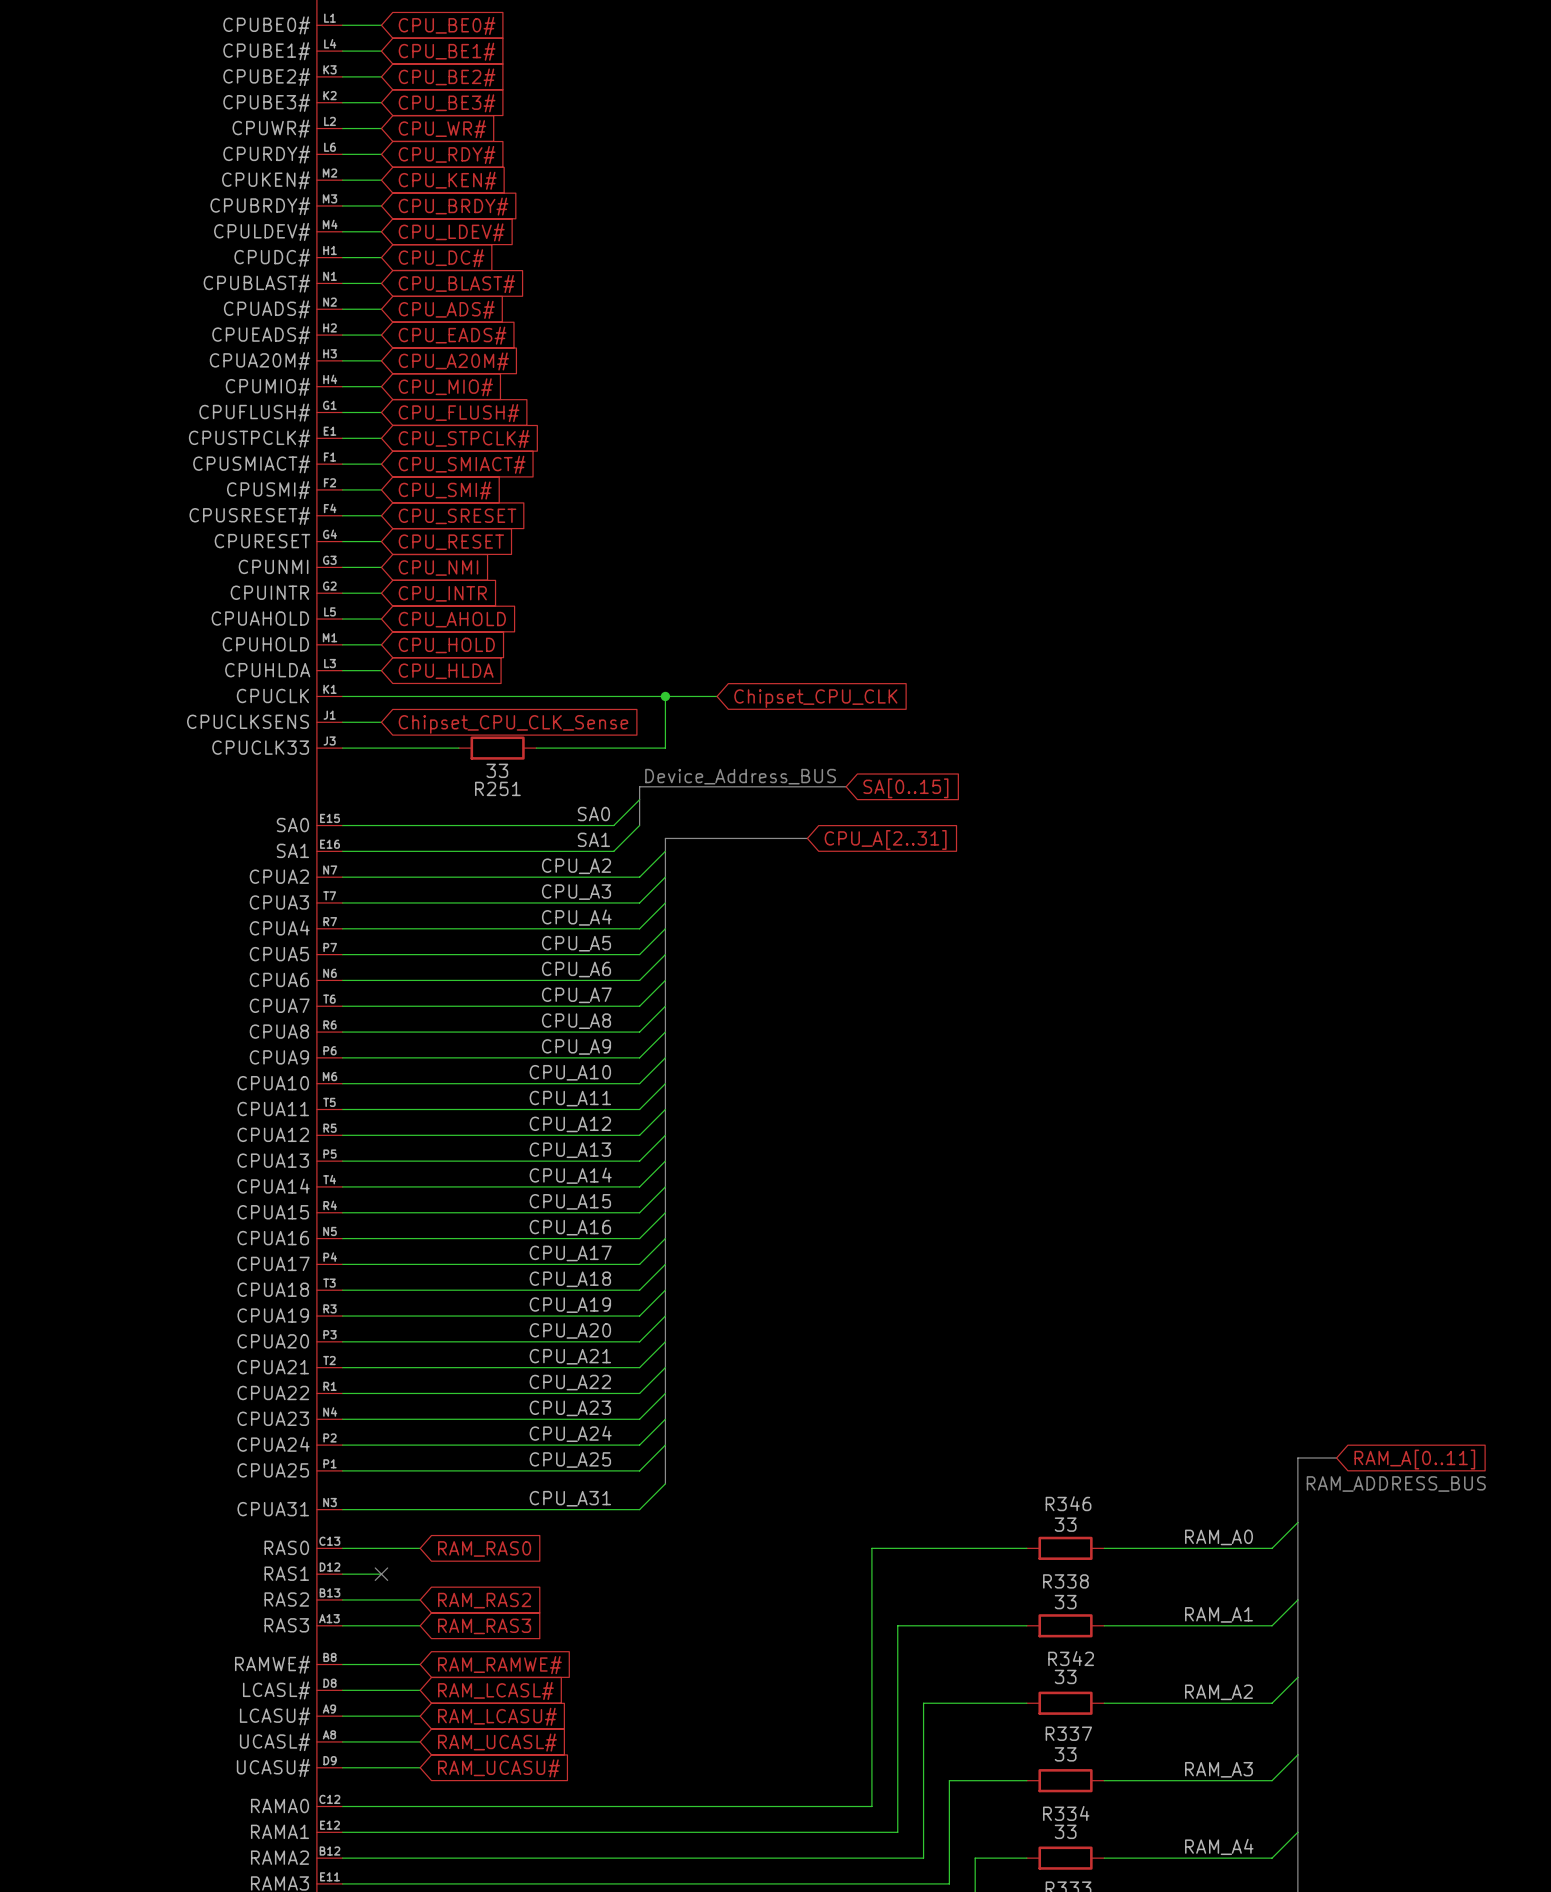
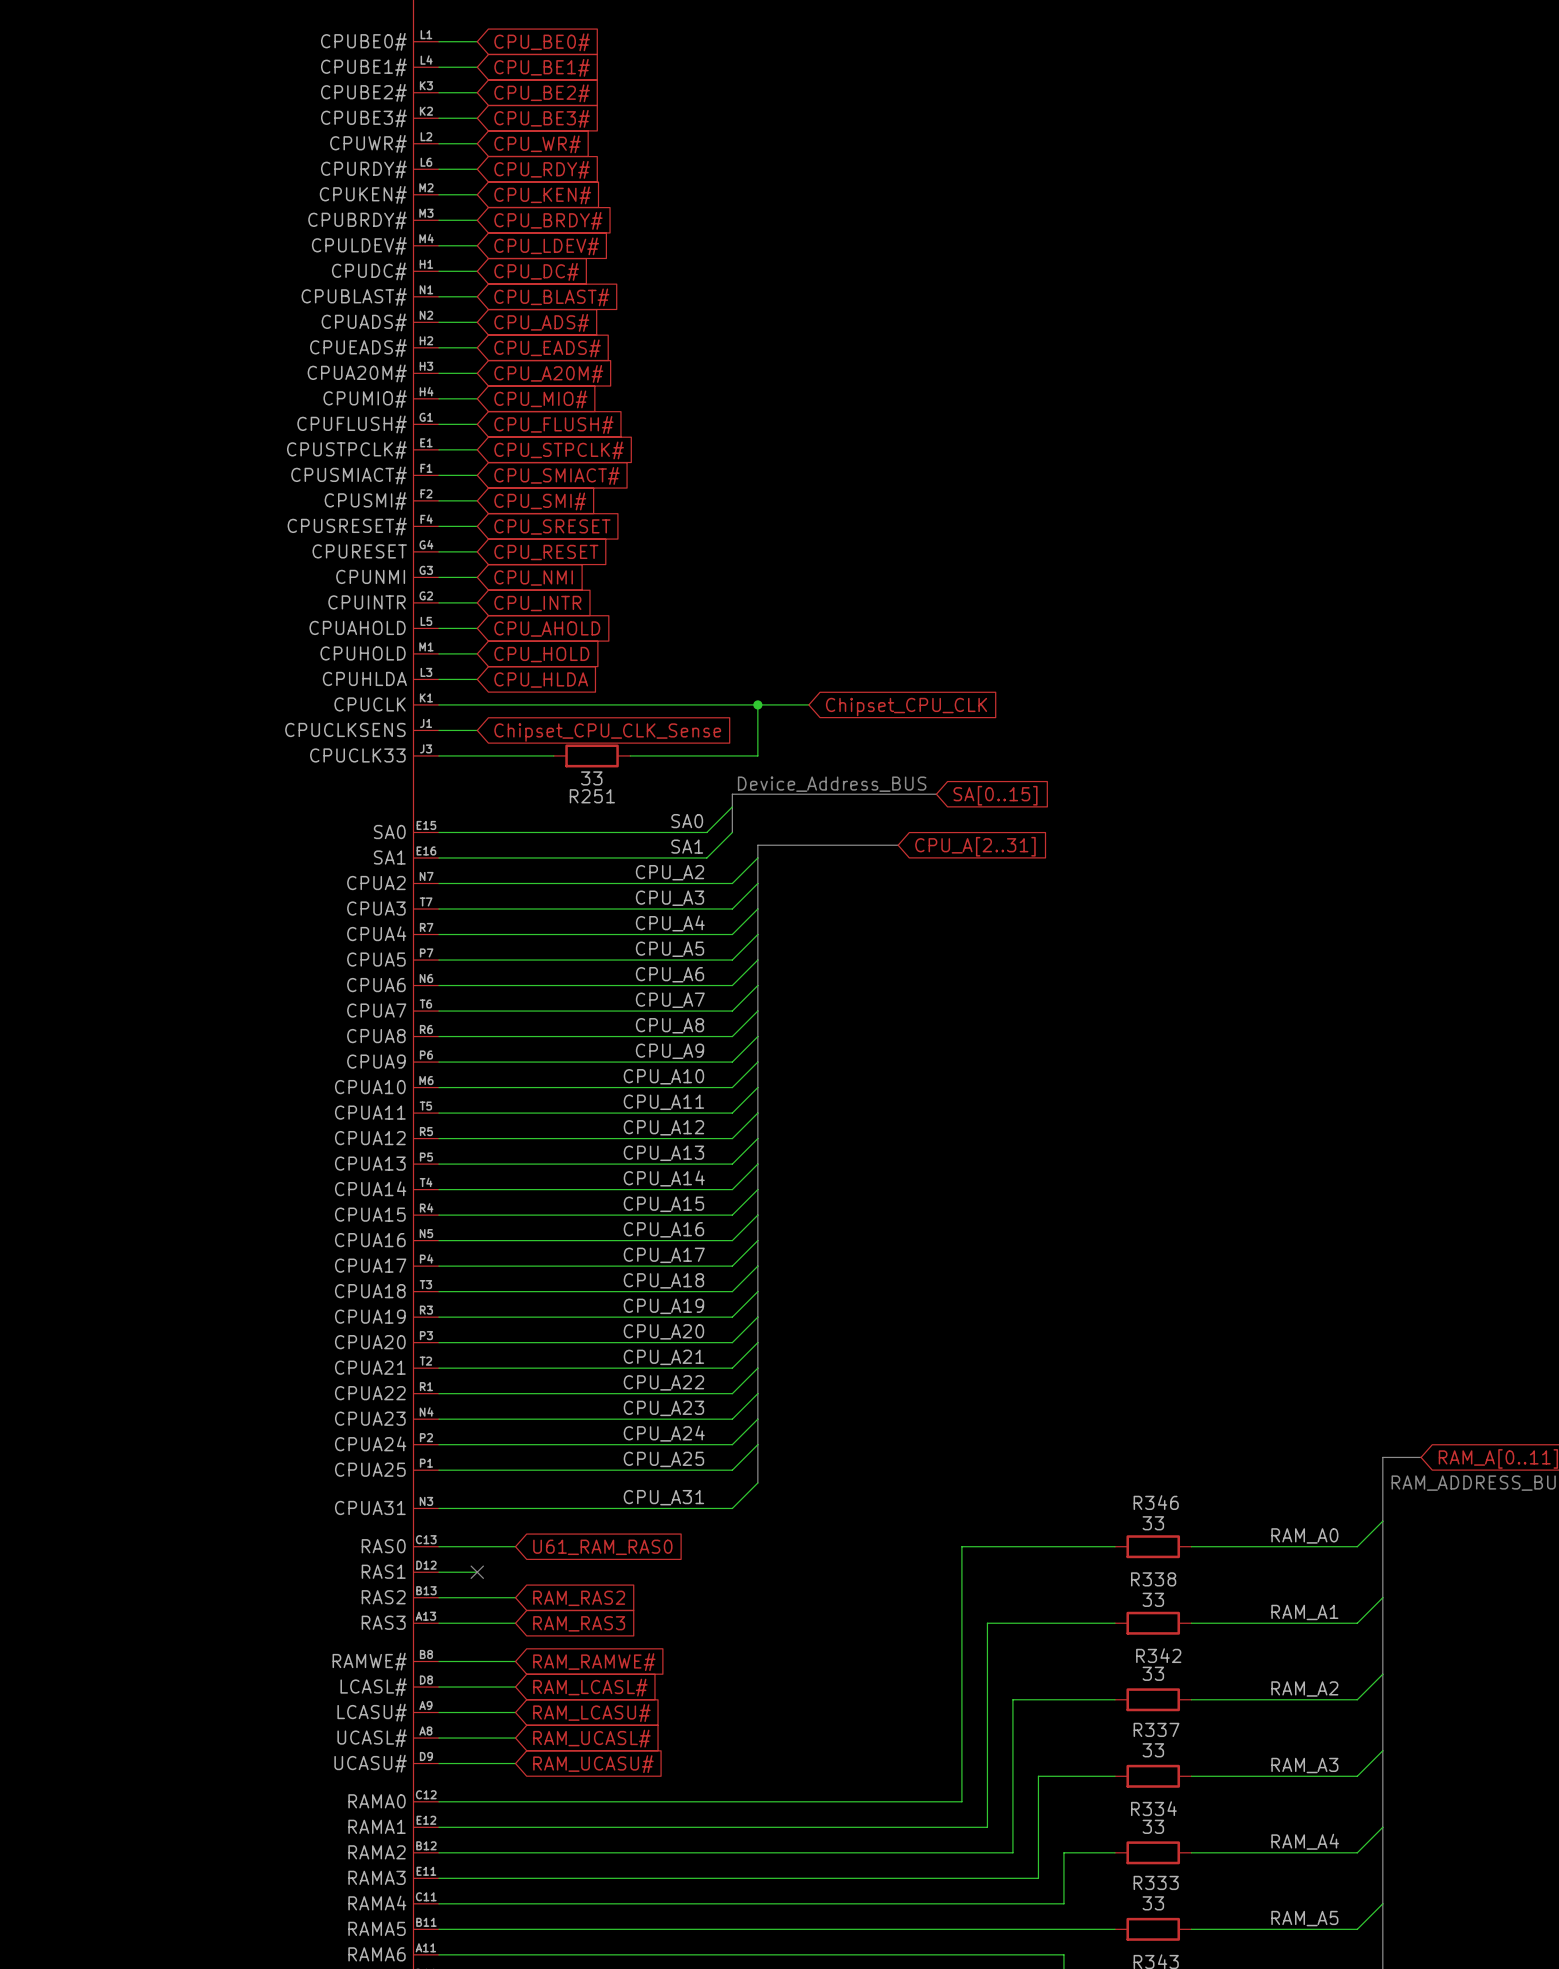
global label: RAM_RAS0 (484, 1548) -> U61_RAM_RAS0 (602, 1547)

